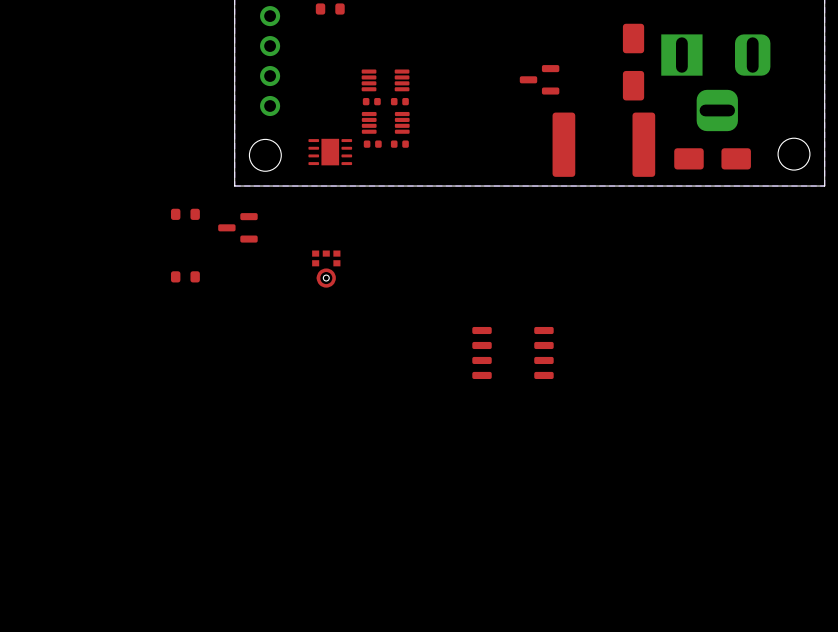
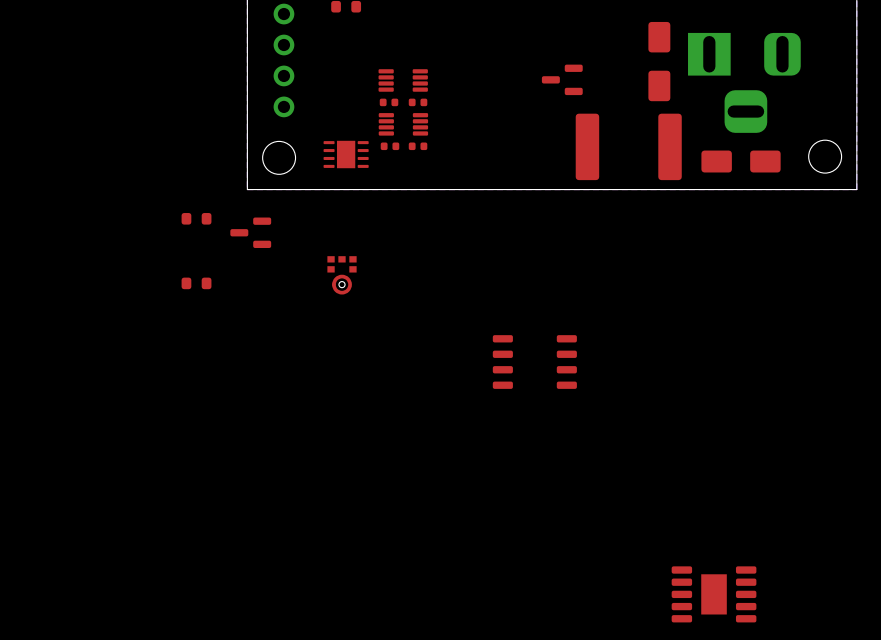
part: none -> (714, 594)

